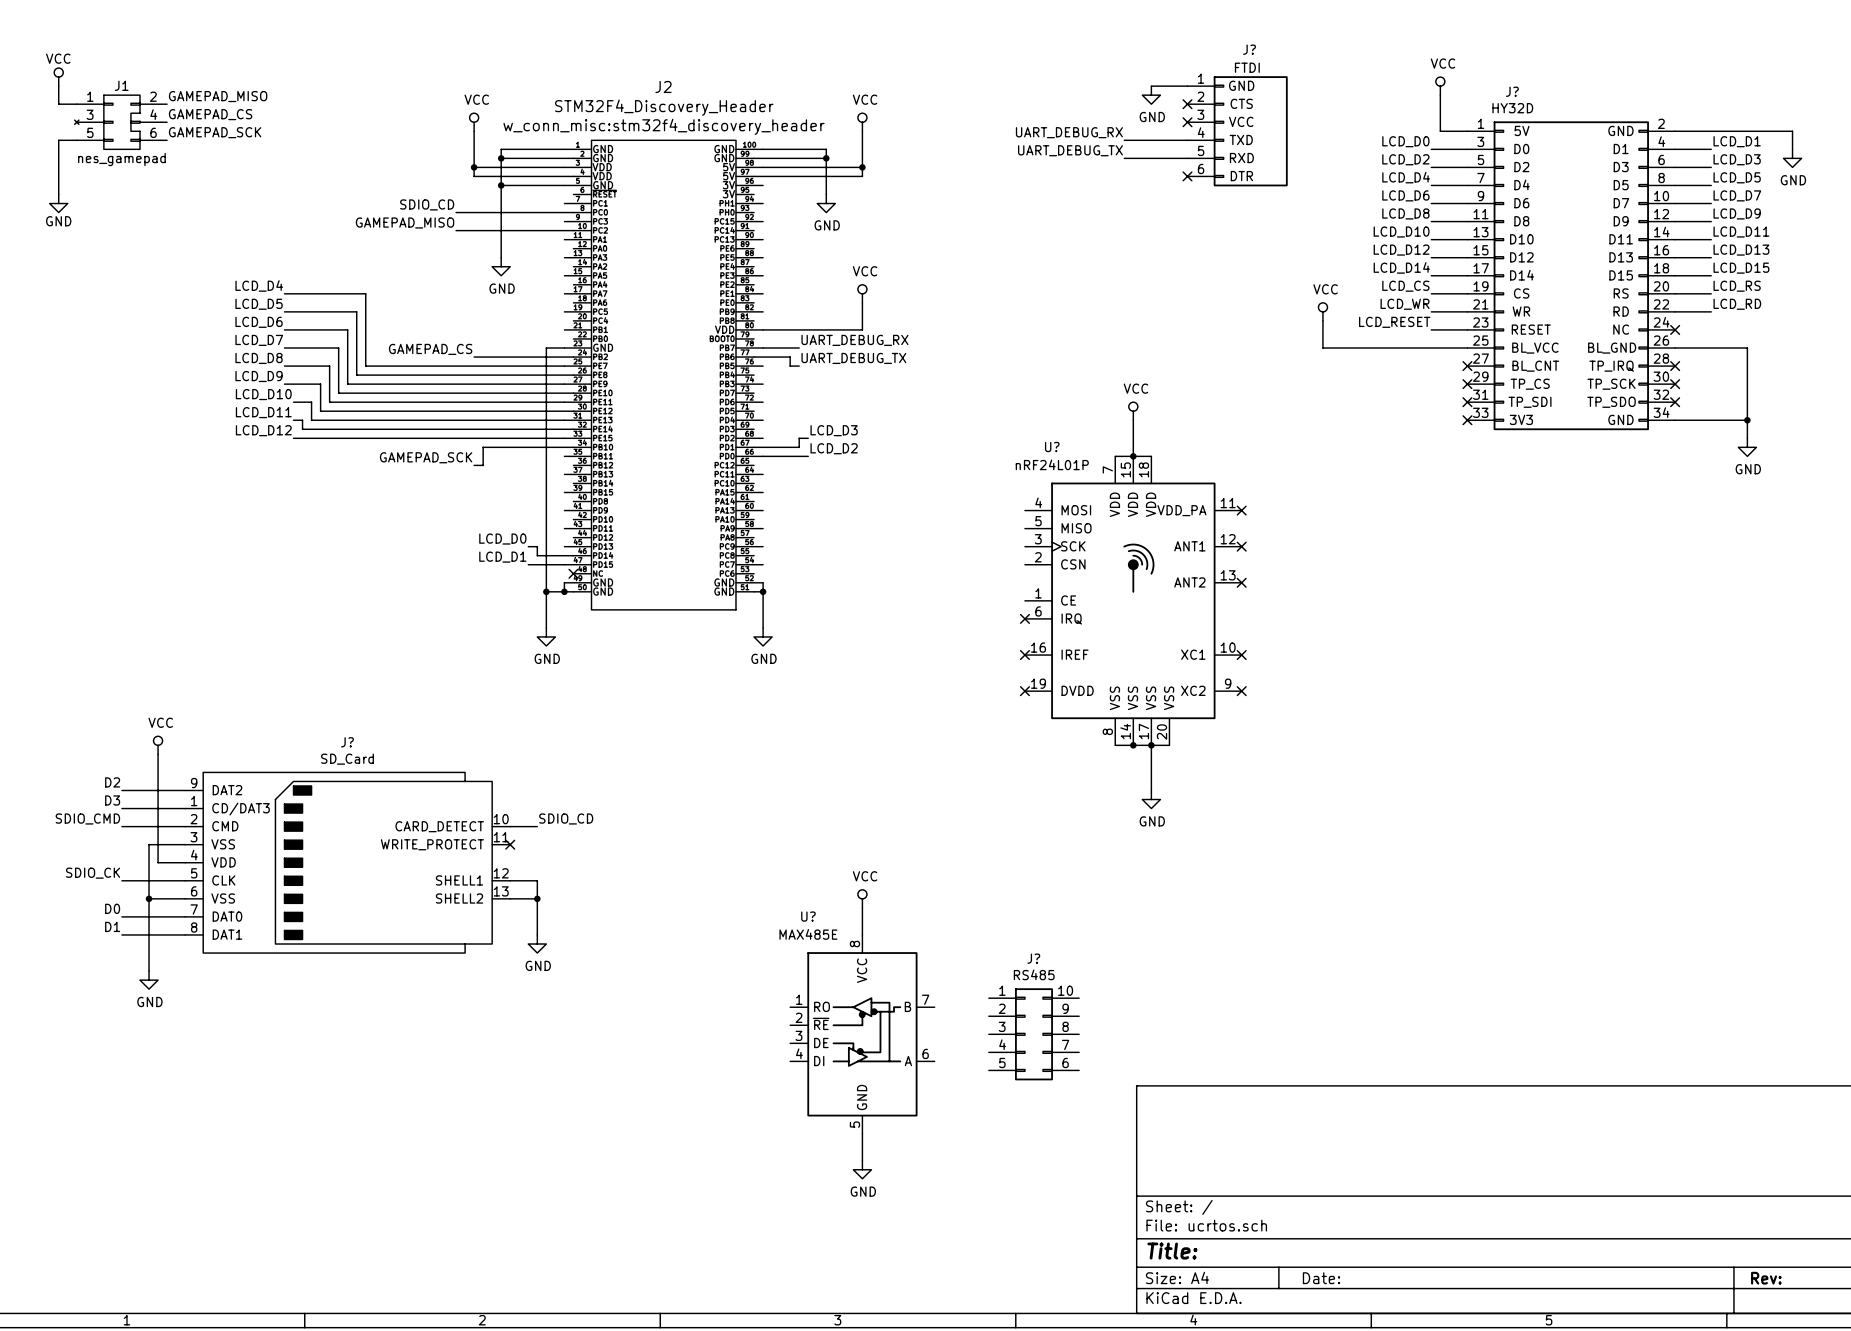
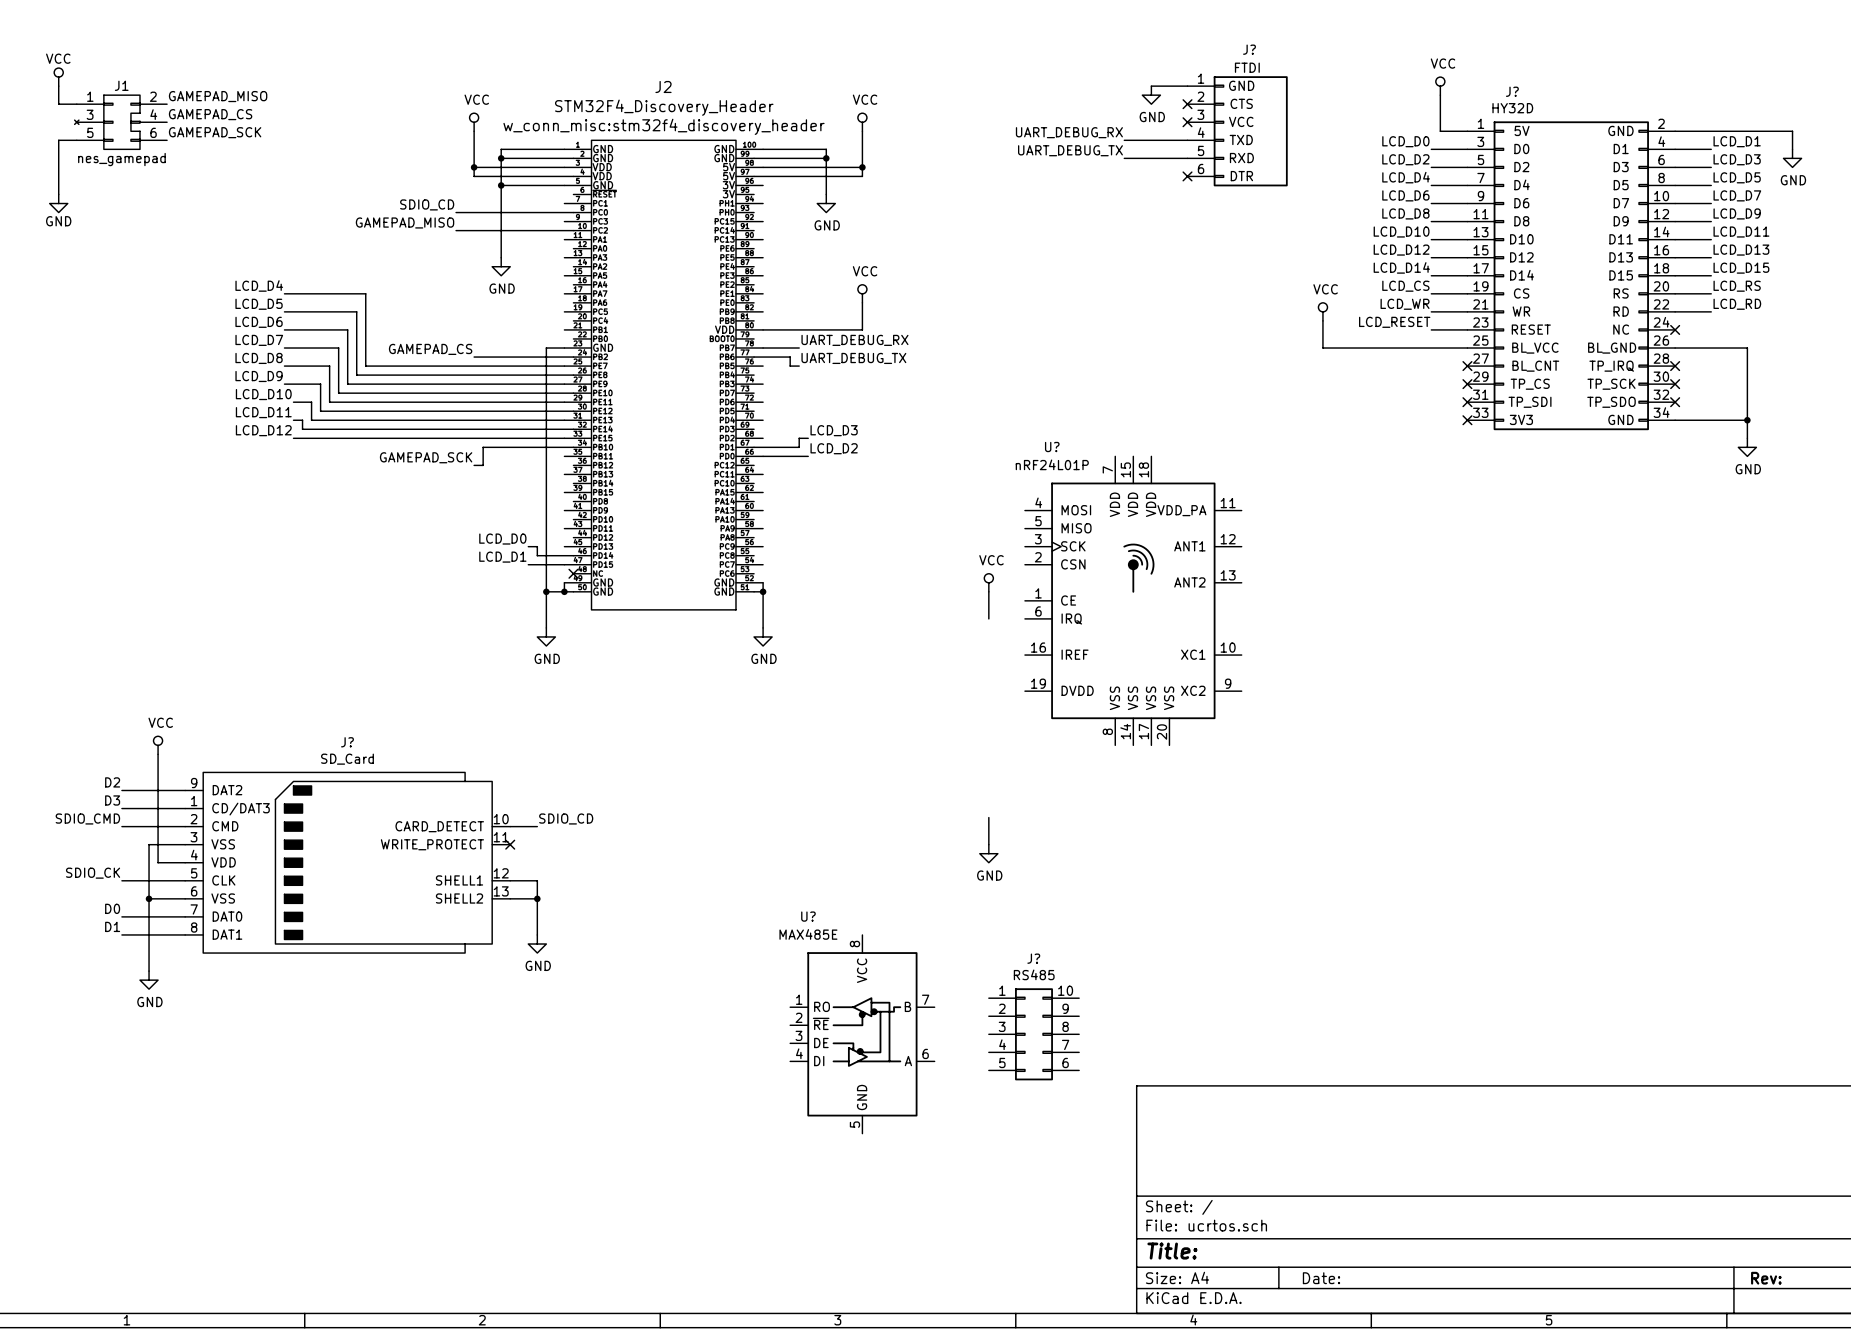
power symbol: VCC (1133, 411) -> none
wire: (1133, 420) (1133, 456) -> none
wire: (1115, 456) (1151, 456) -> none
junction: (1133, 456) -> none
no-connect mark: (1241, 510) -> none
no-connect mark: (1241, 546) -> none
power symbol: none -> VCC (988, 582)
no-connect mark: (1241, 582) -> none
wire: none -> (988, 591) (988, 618)
no-connect mark: (1024, 618) -> none
no-connect mark: (1024, 655) -> none
no-connect mark: (1241, 655) -> none
no-connect mark: (1024, 691) -> none
no-connect mark: (1241, 691) -> none
wire: (1115, 745) (1169, 745) -> none
junction: (1133, 745) -> none
wire: (1151, 745) (1151, 790) -> none
junction: (1151, 745) -> none
power symbol: GND (1151, 799) -> none
power symbol: none -> GND (988, 853)
power symbol: VCC (862, 898) -> none
wire: (862, 907) (862, 934) -> (988, 817) (988, 844)
wire: (862, 1133) (862, 1160) -> none
power symbol: GND (862, 1169) -> none

